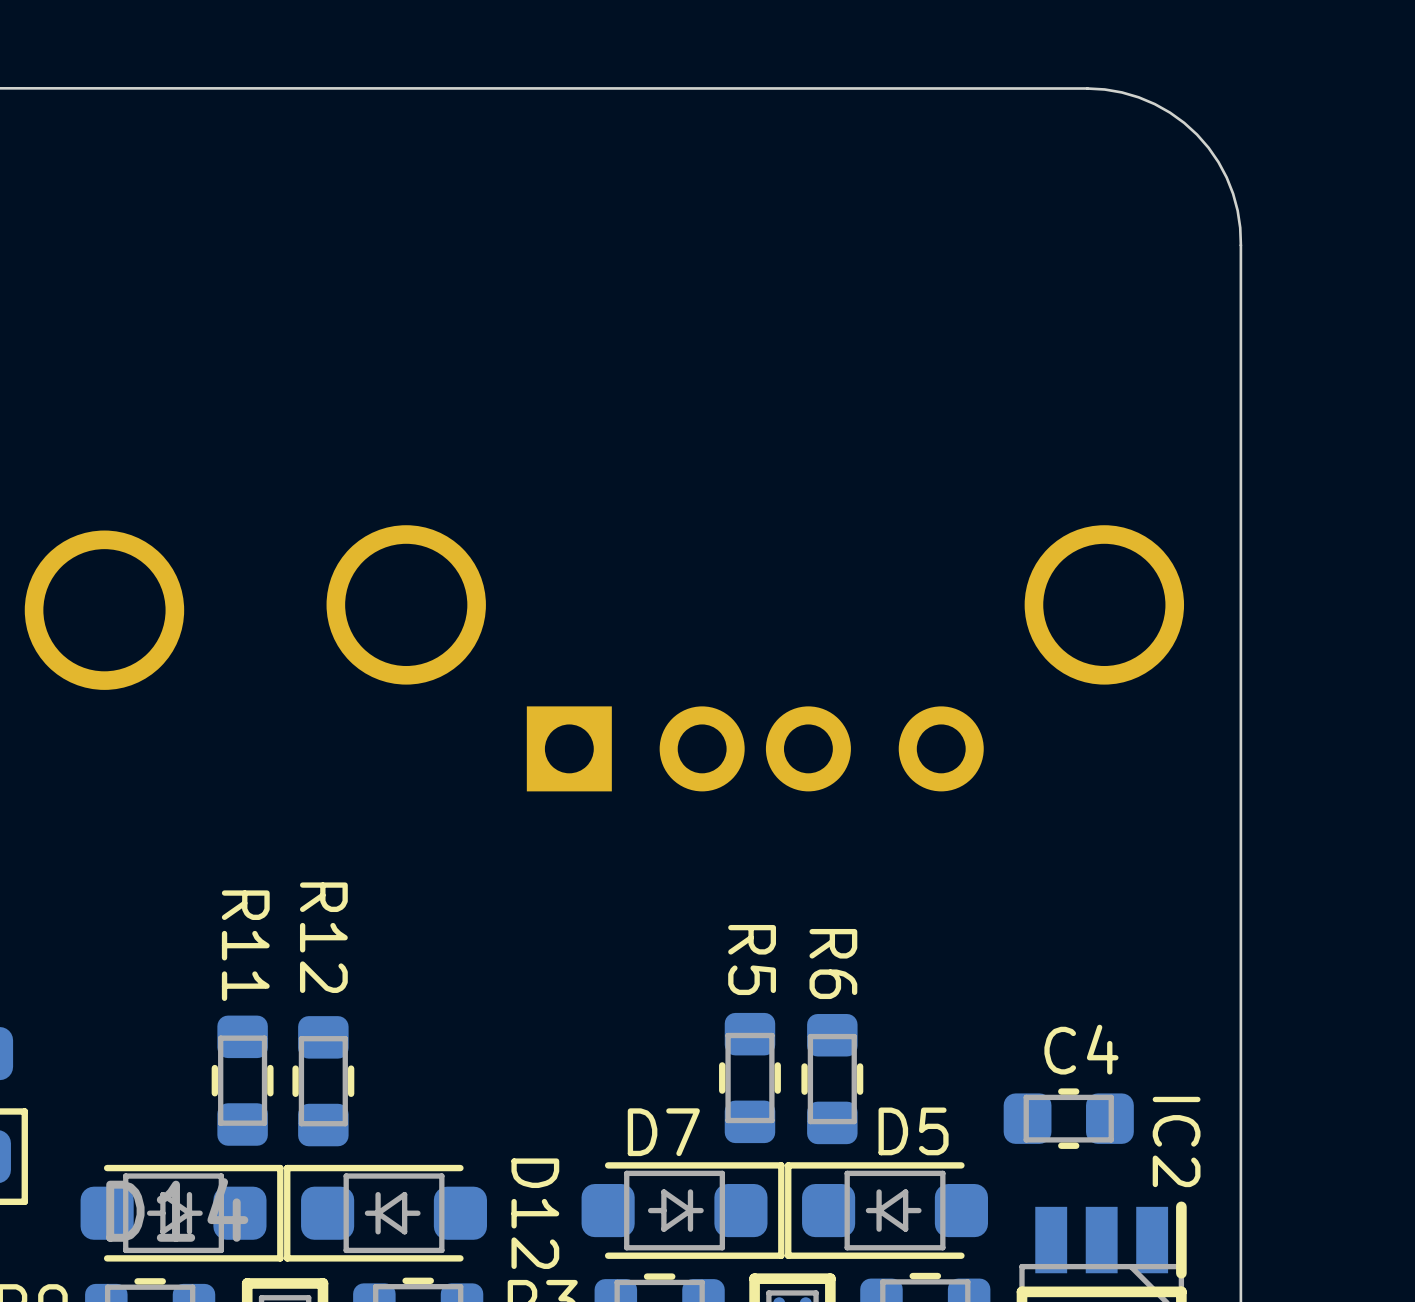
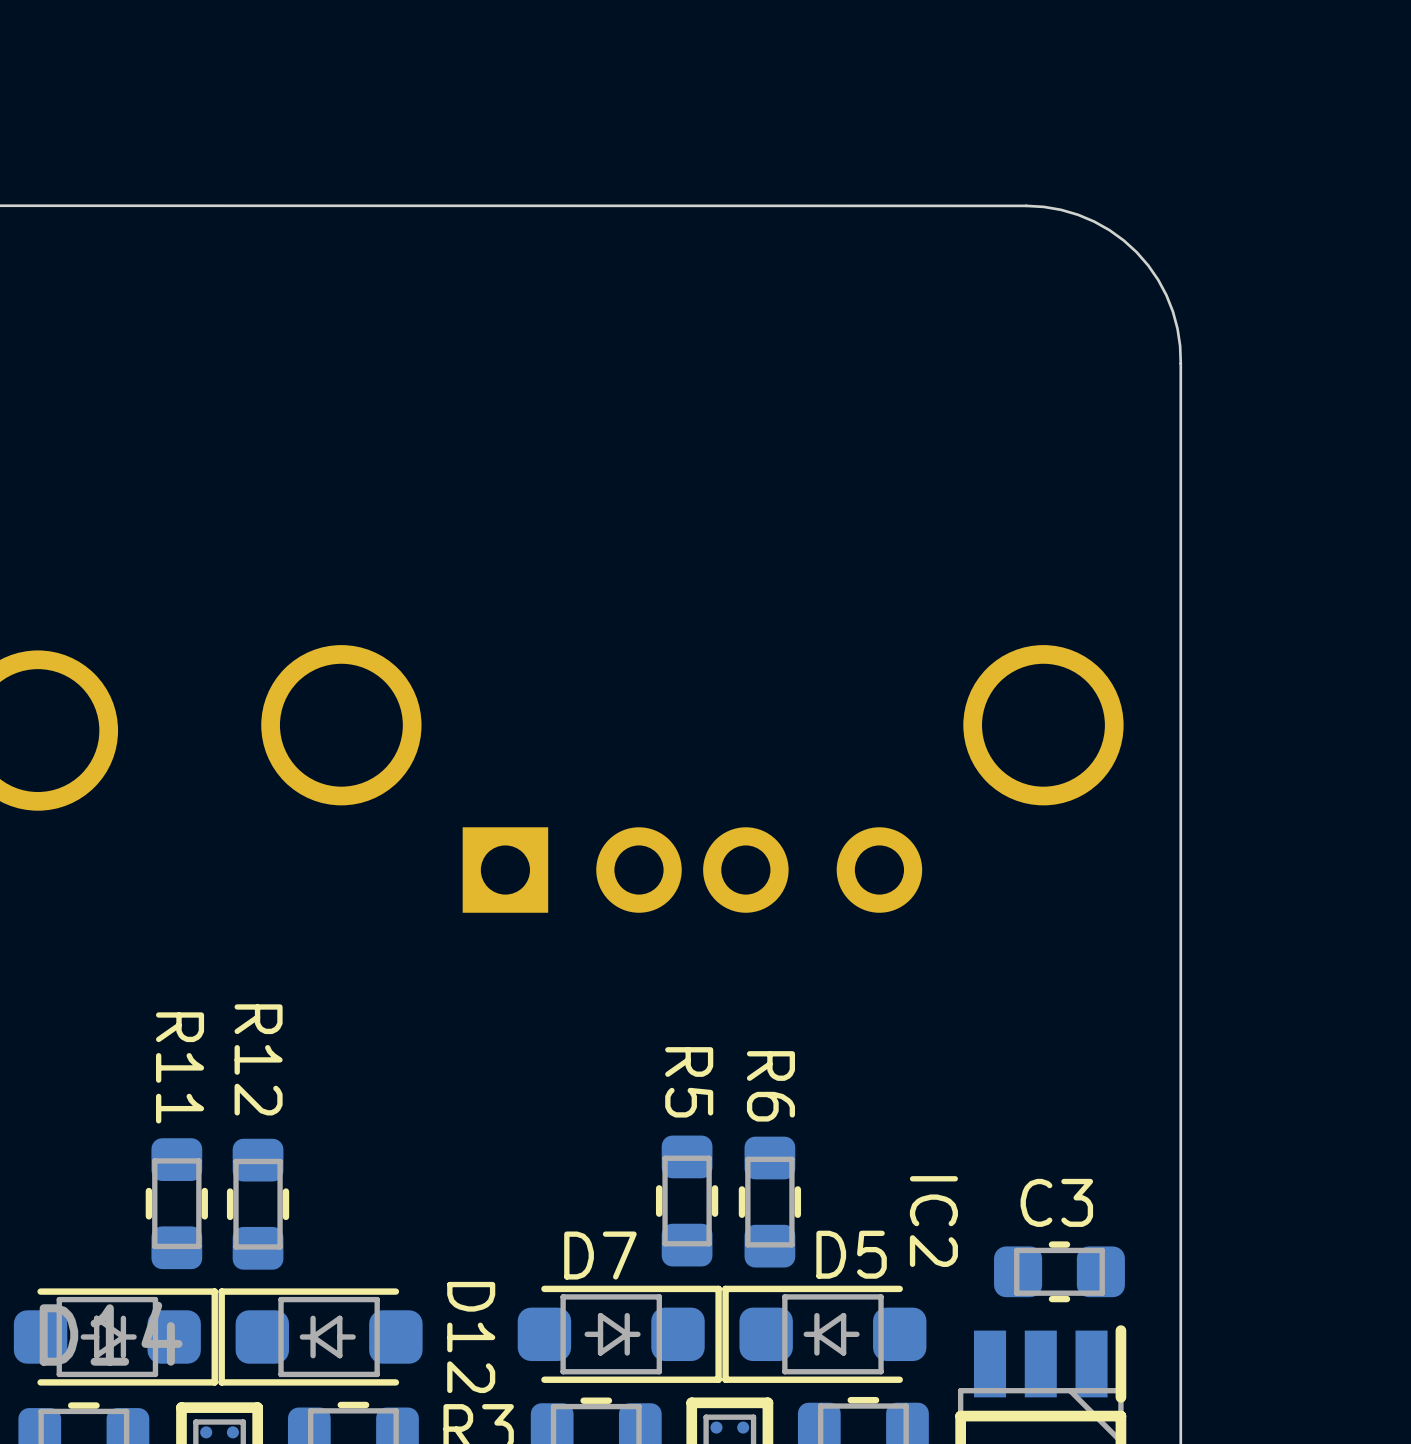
C4: (1068, 1118) -> none
IC2 name position: IC2 (1176, 1141) -> IC2 (933, 1221)
C3: none -> (1059, 1271)

